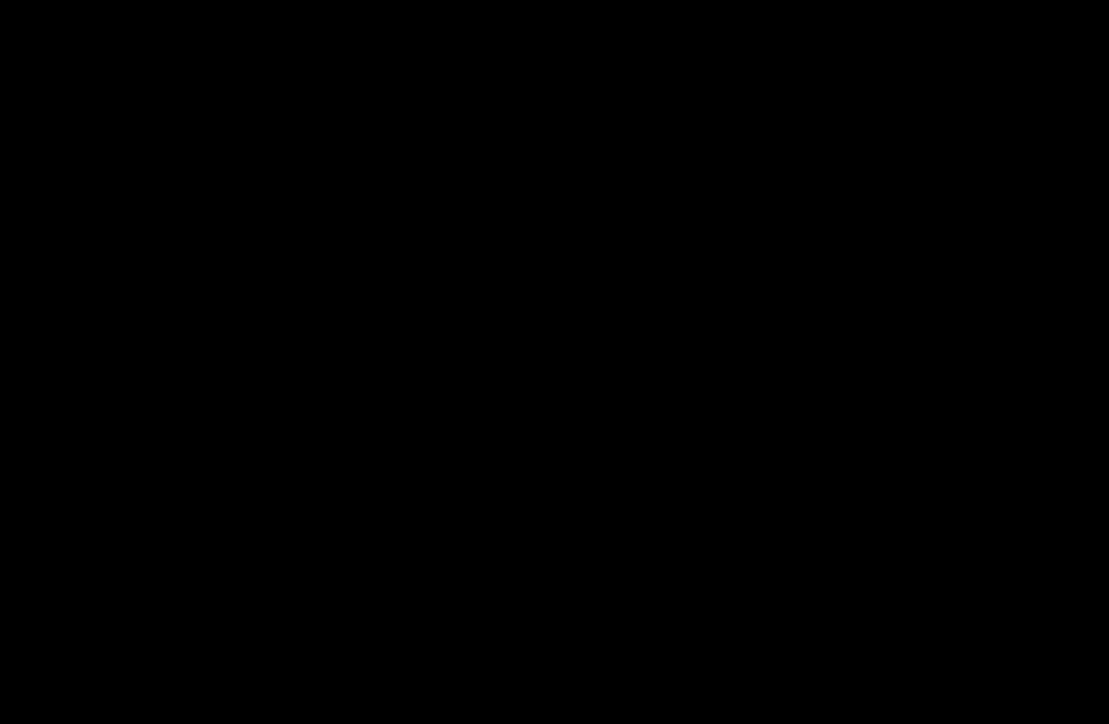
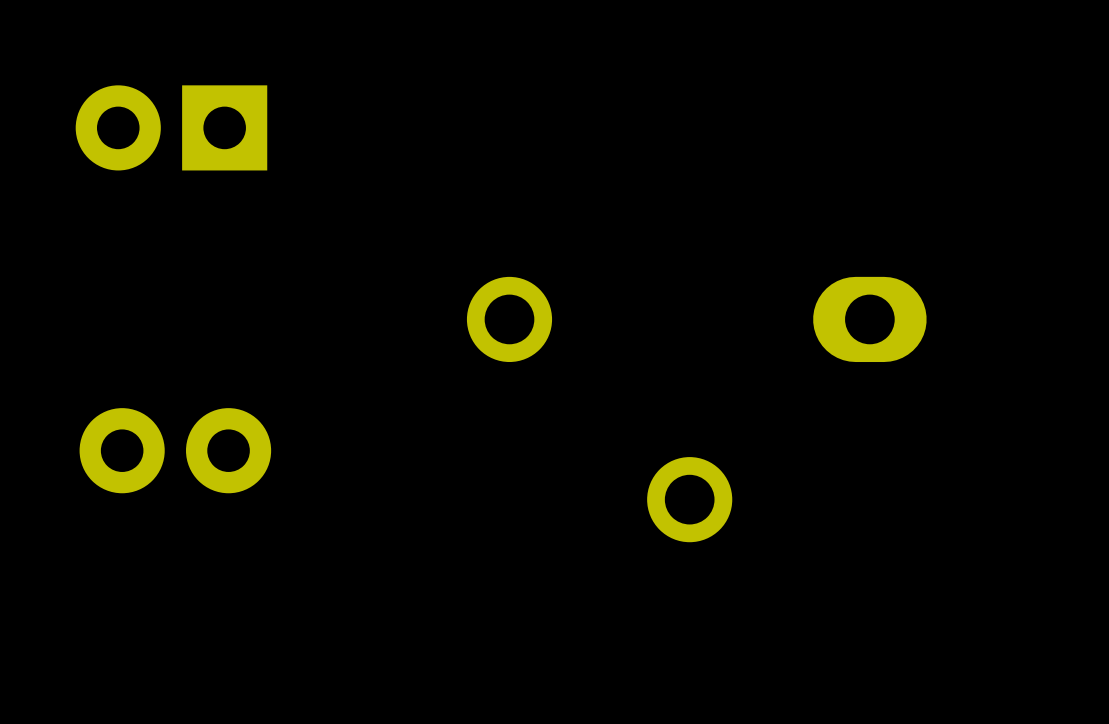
part: none -> (171, 127)
part: none -> (696, 409)
part: none -> (175, 450)

